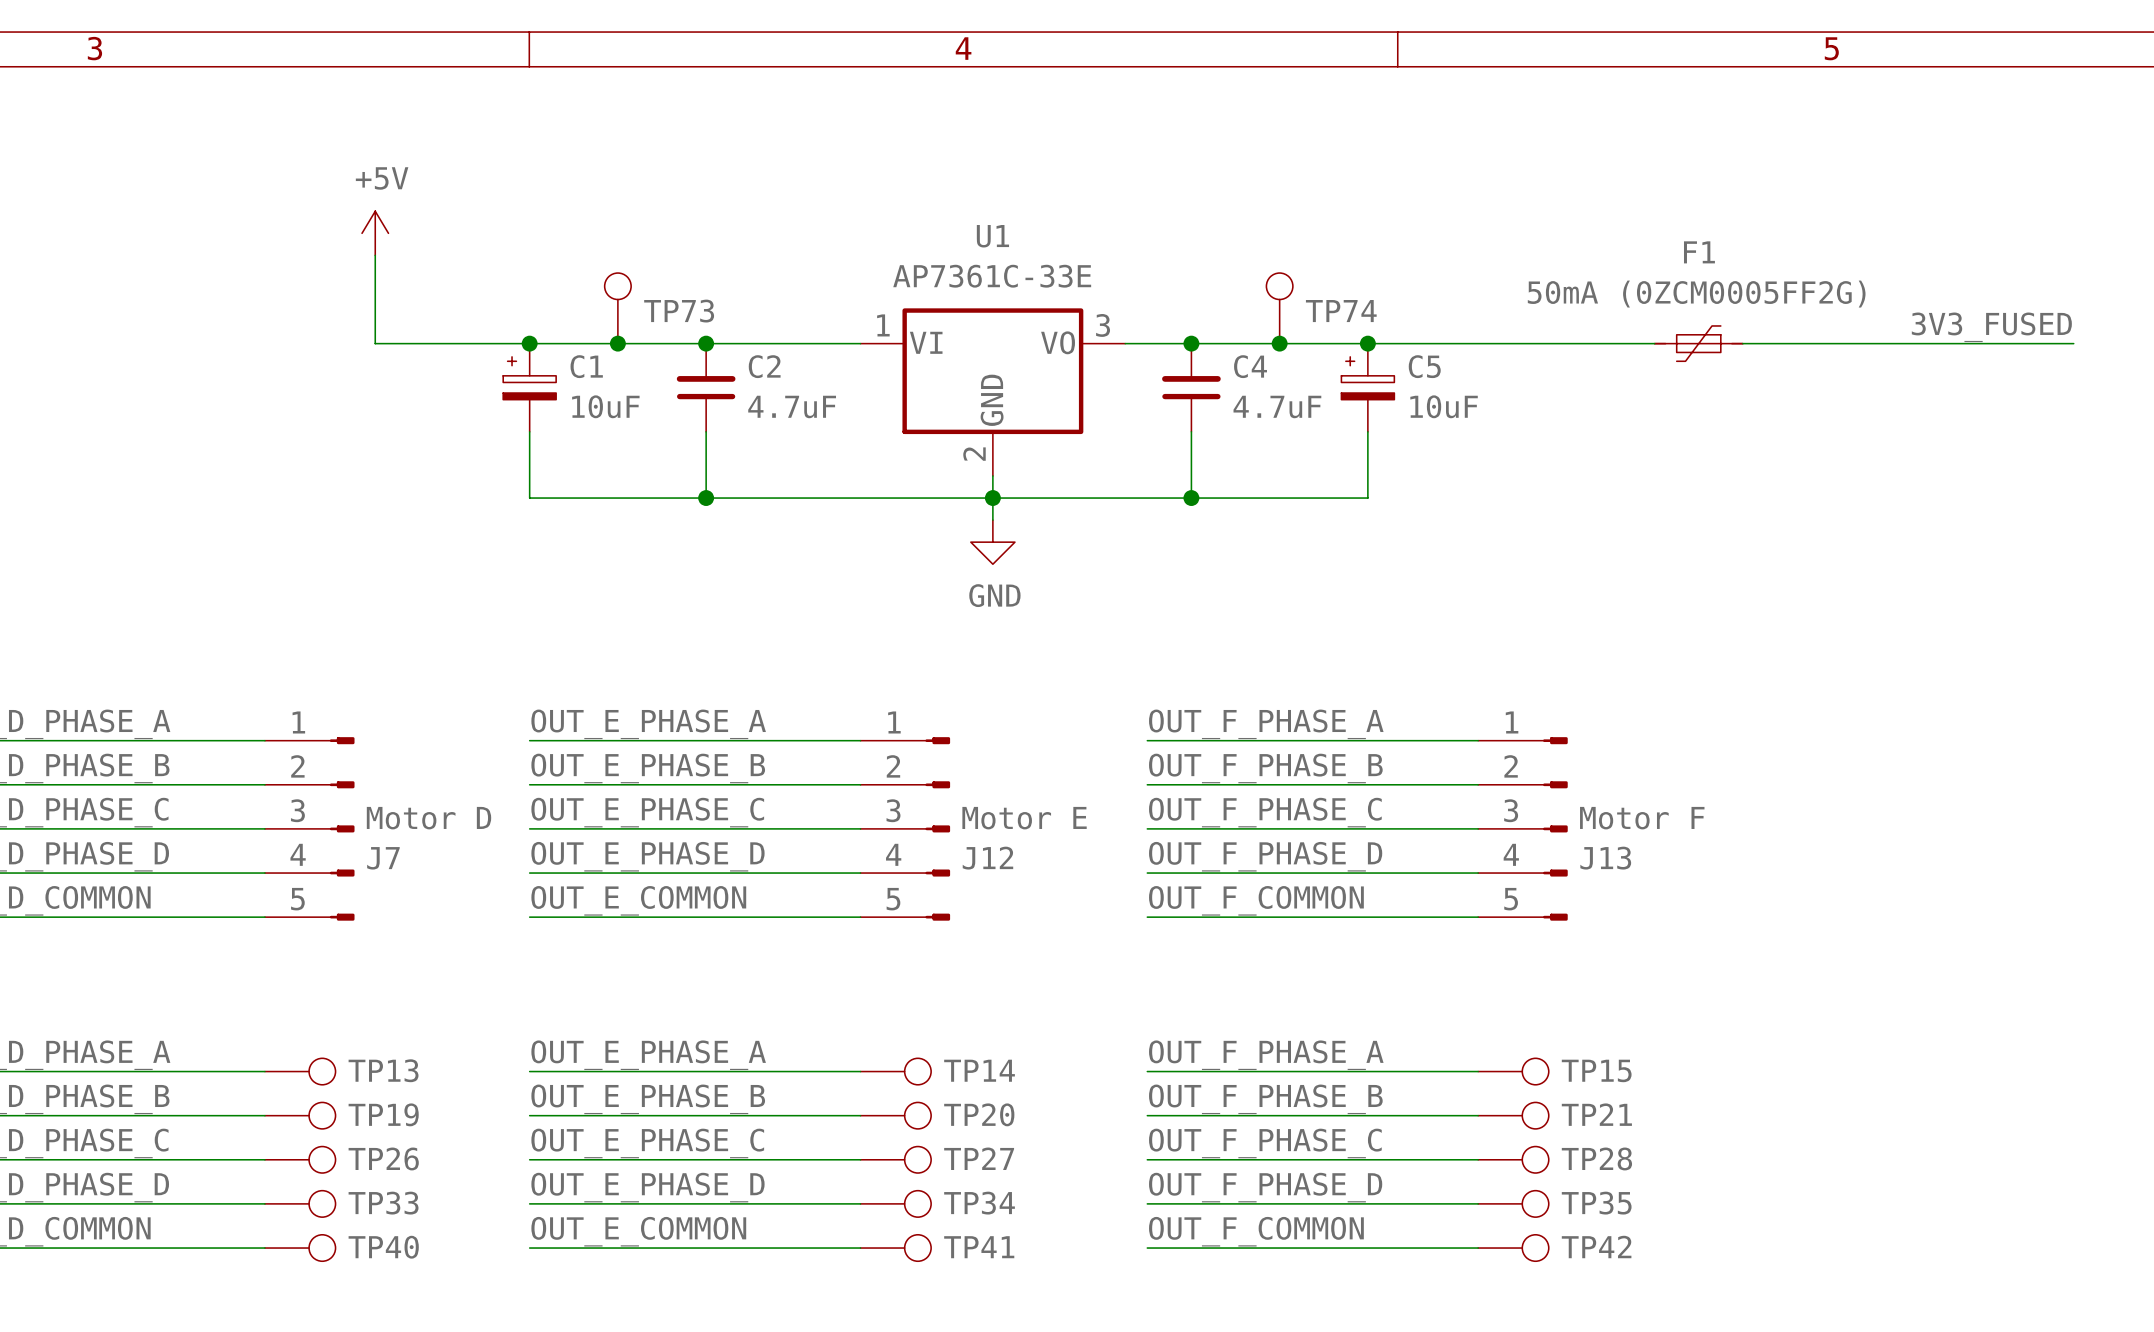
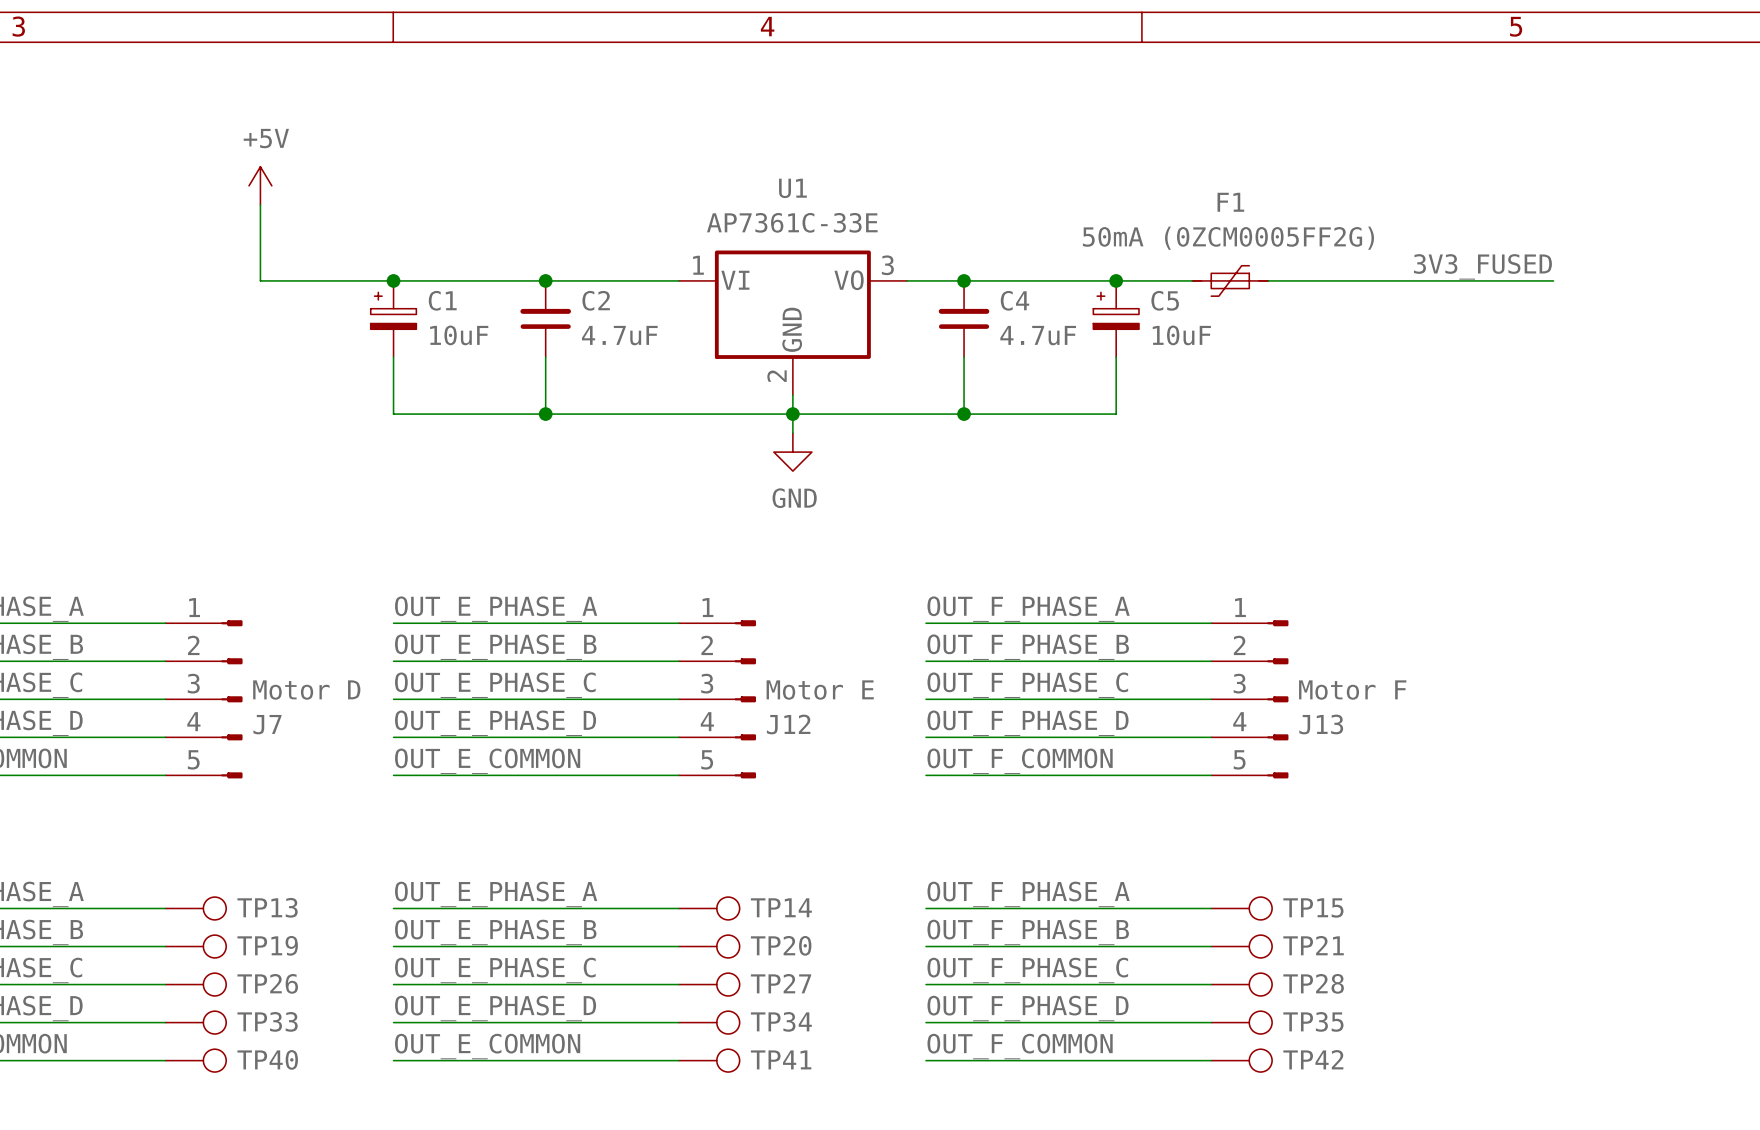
TP73: (617, 308) -> none
TP74: (1279, 308) -> none
label position: 3V3_FUSED (1991, 327) -> 3V3_FUSED (1482, 266)
junction: (617, 343) -> none
junction: (1279, 343) -> none
F1 position: (1698, 343) -> (1230, 280)
wire: (1875, 343) (2073, 343) -> none

